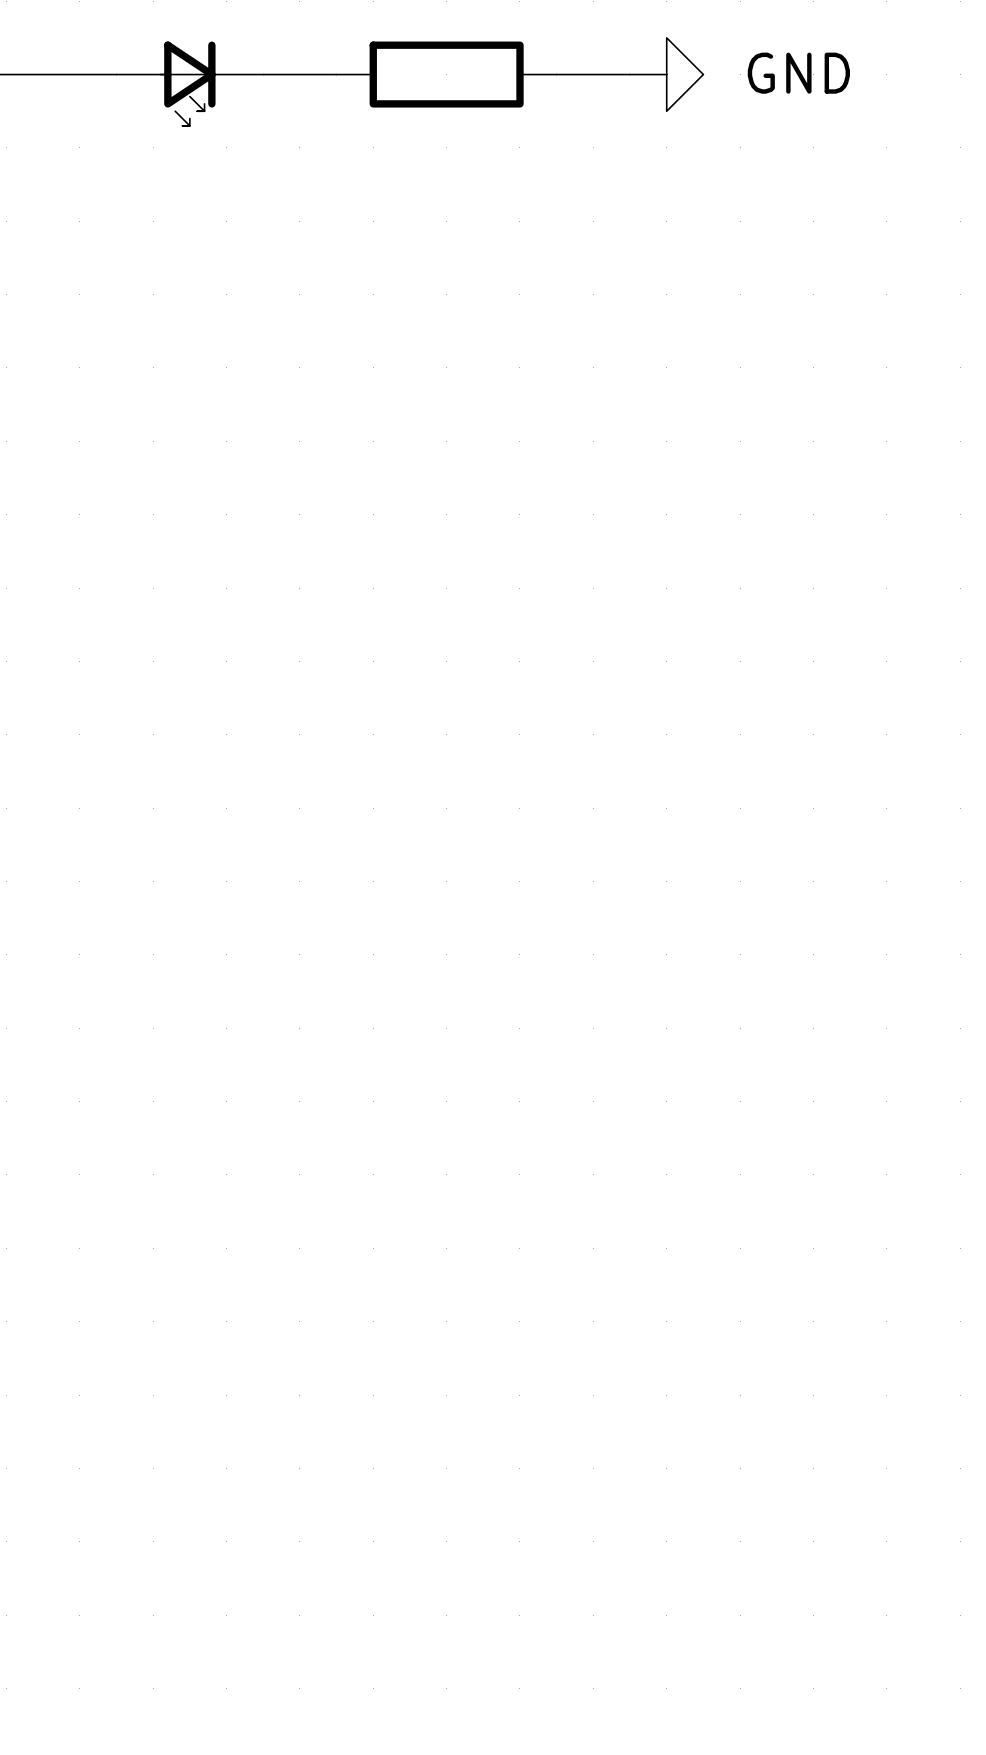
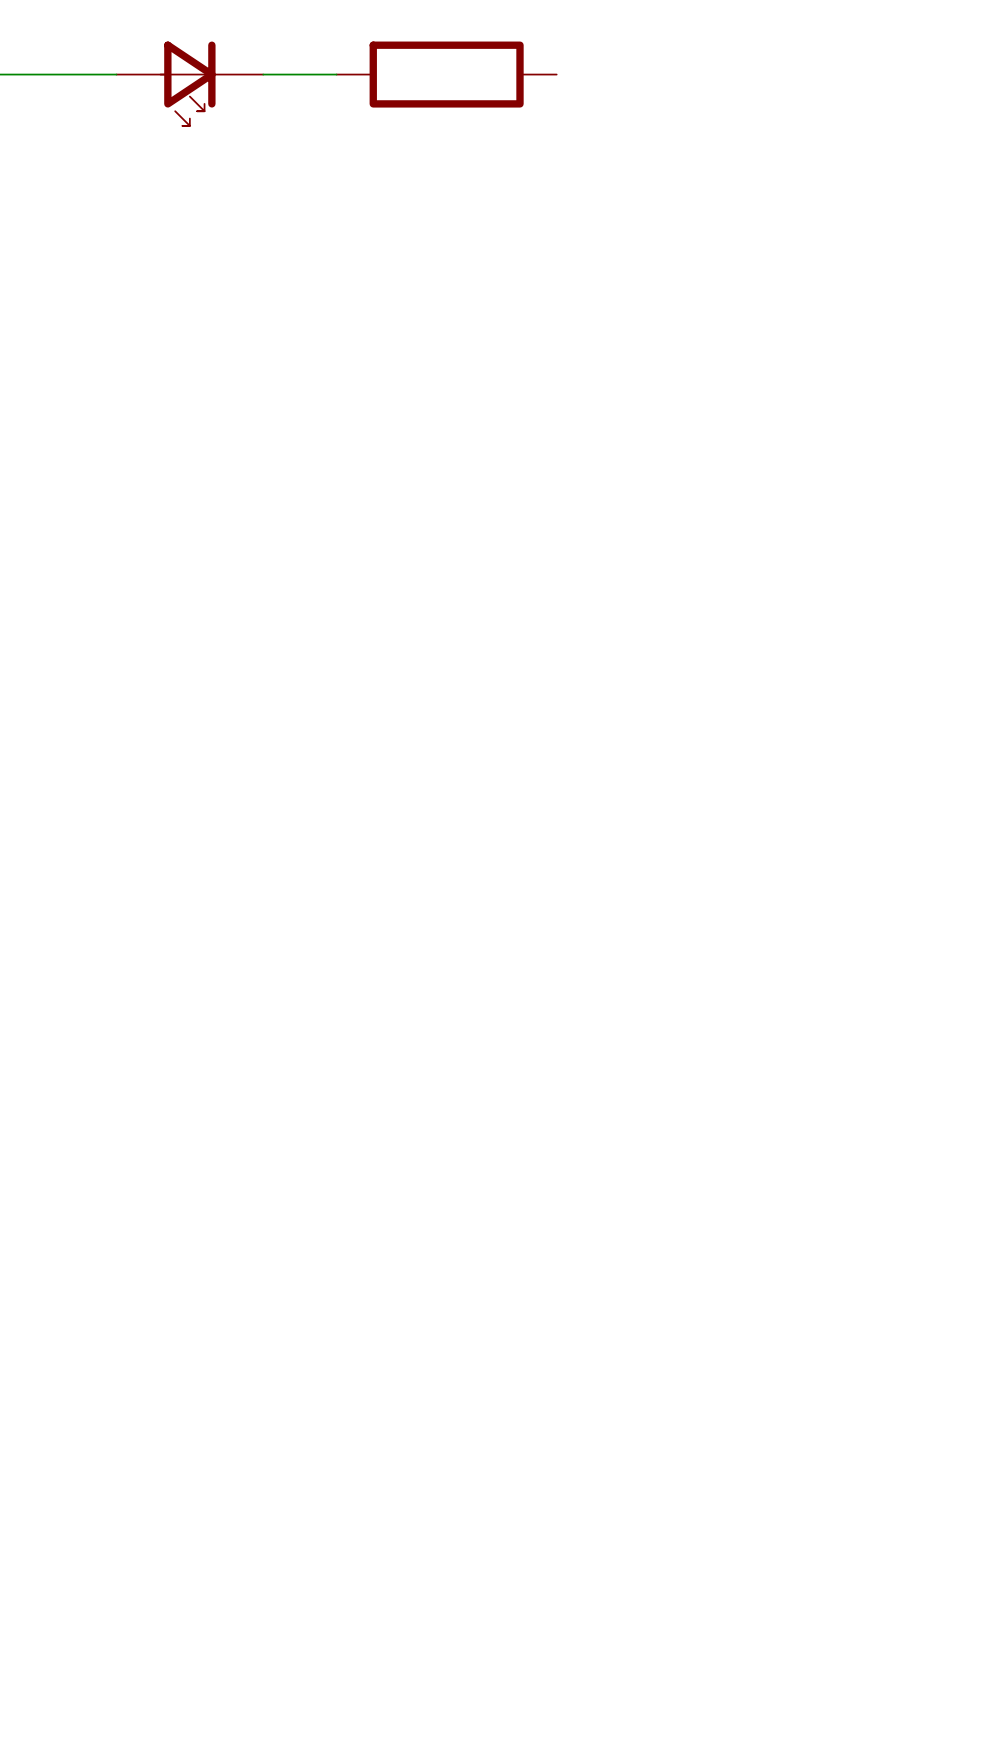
wire: (556, 74) (630, 74) -> none
power symbol: GND (666, 74) -> none

